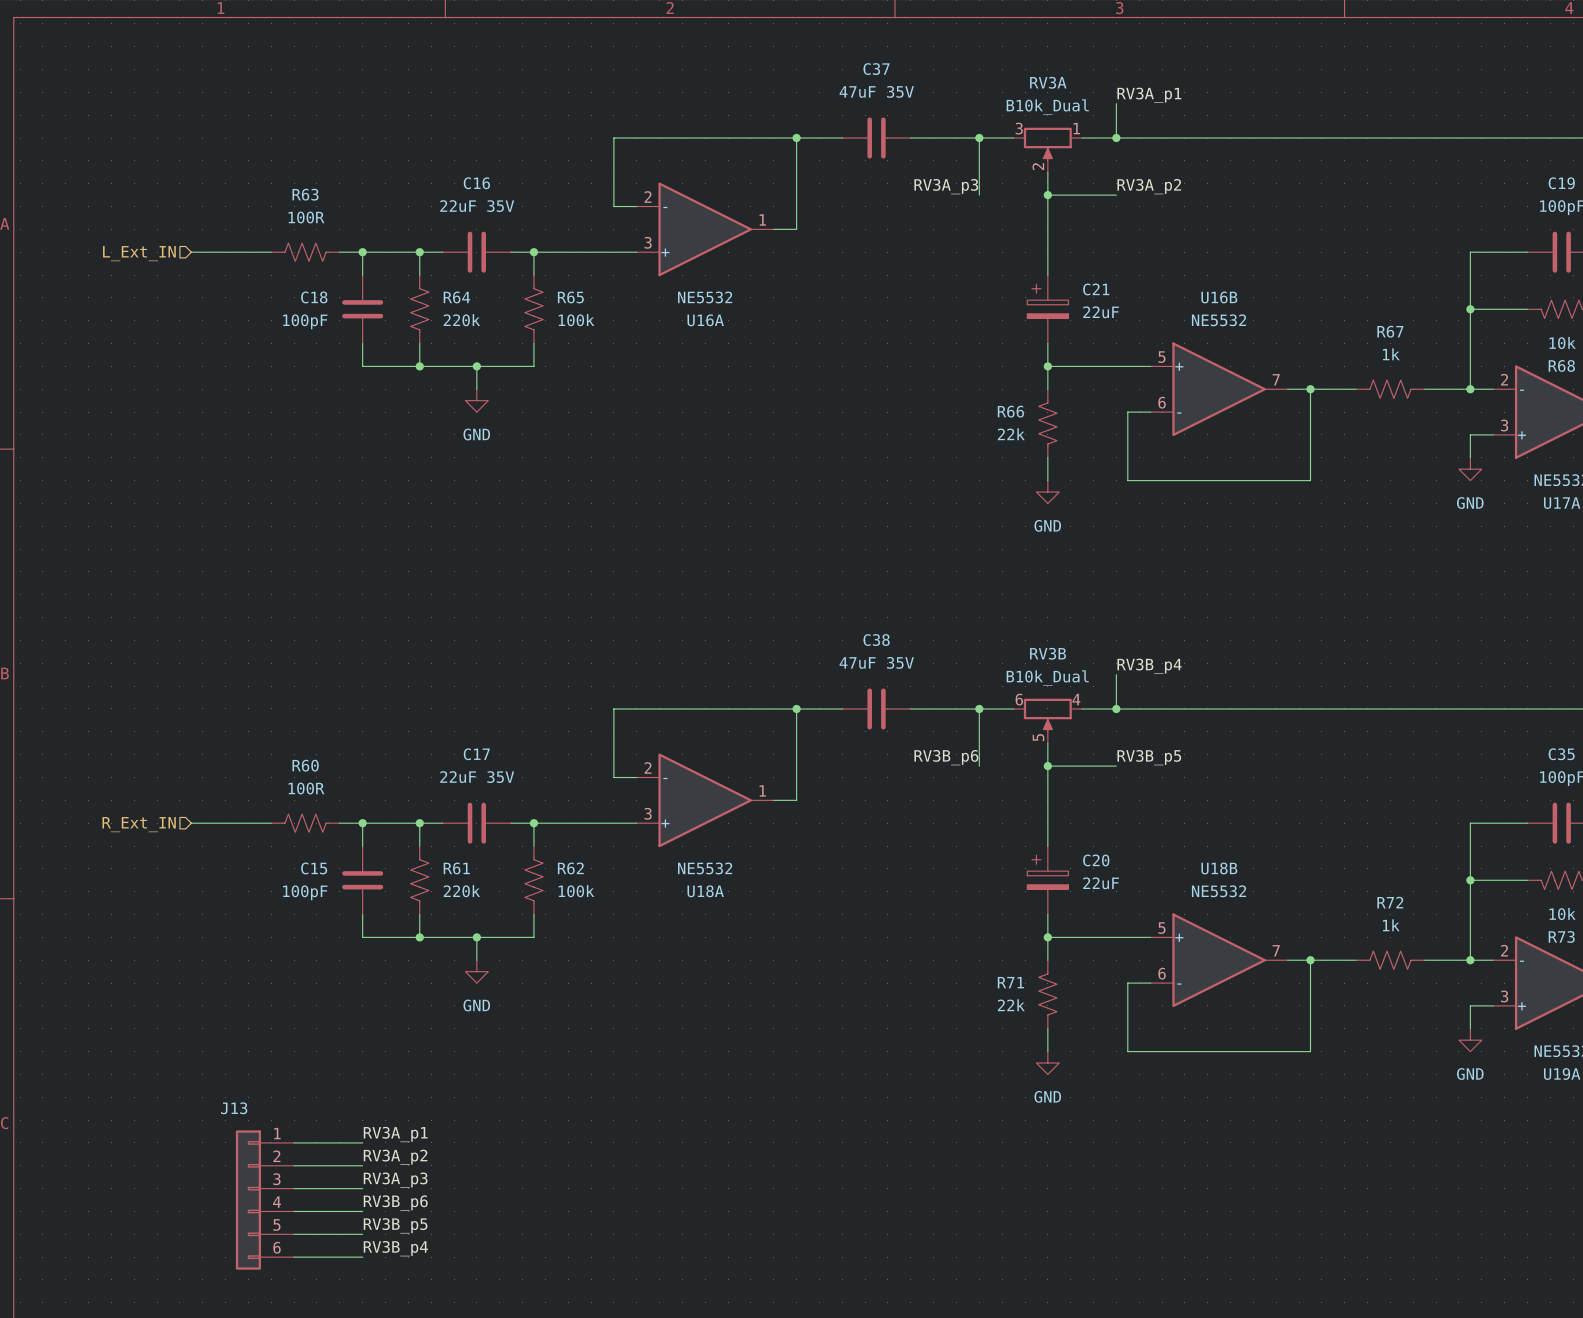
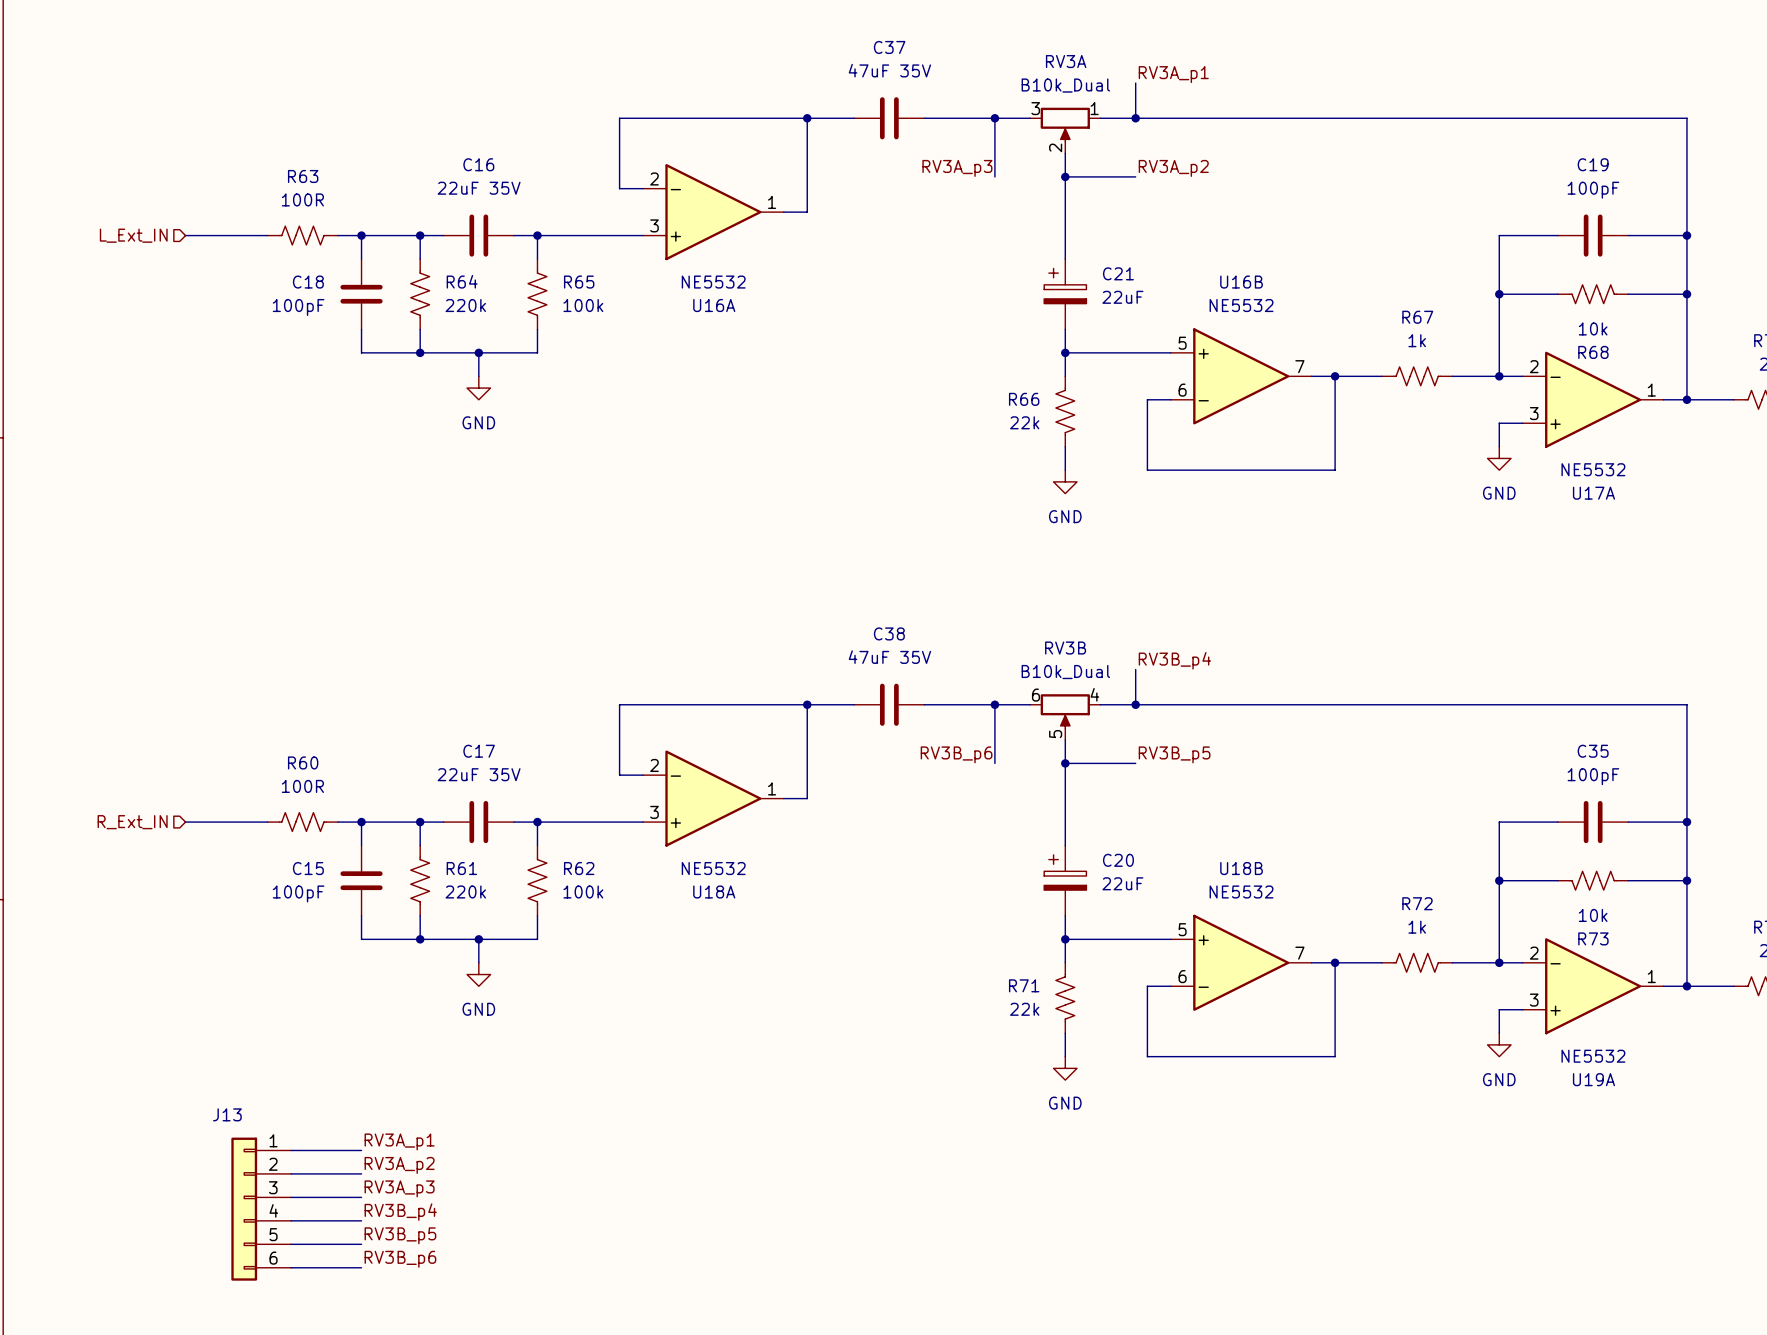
label: RV3B_p6 (395, 1203) -> RV3B_p4 (400, 1212)
label: RV3B_p4 (395, 1248) -> RV3B_p6 (400, 1259)

